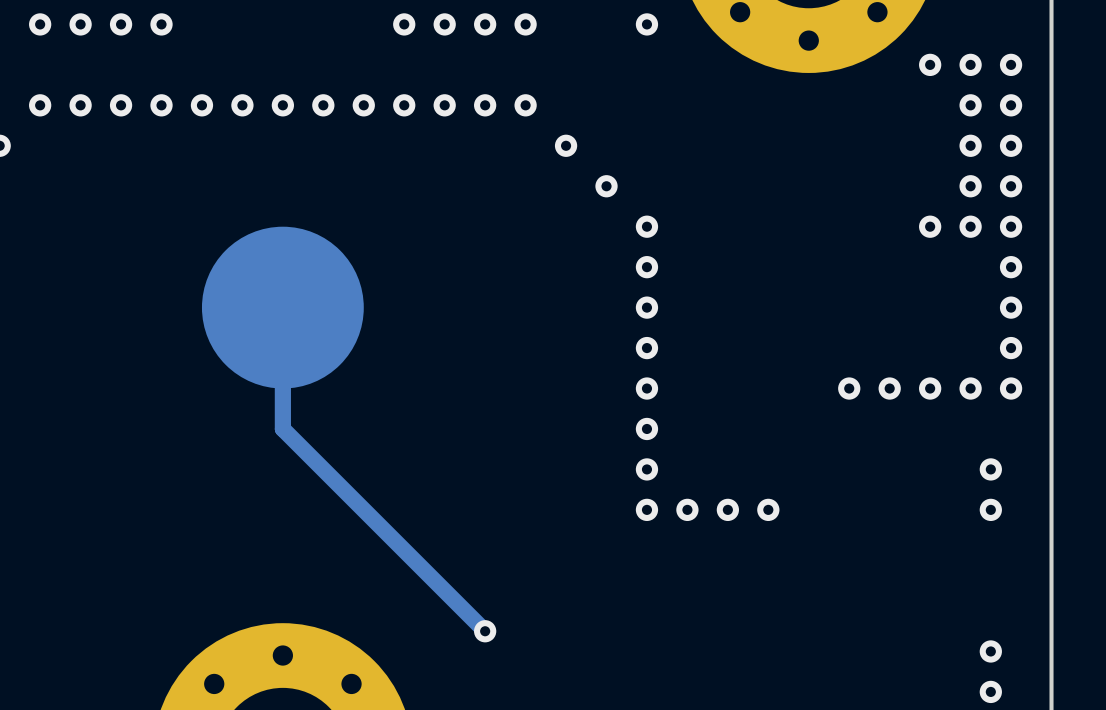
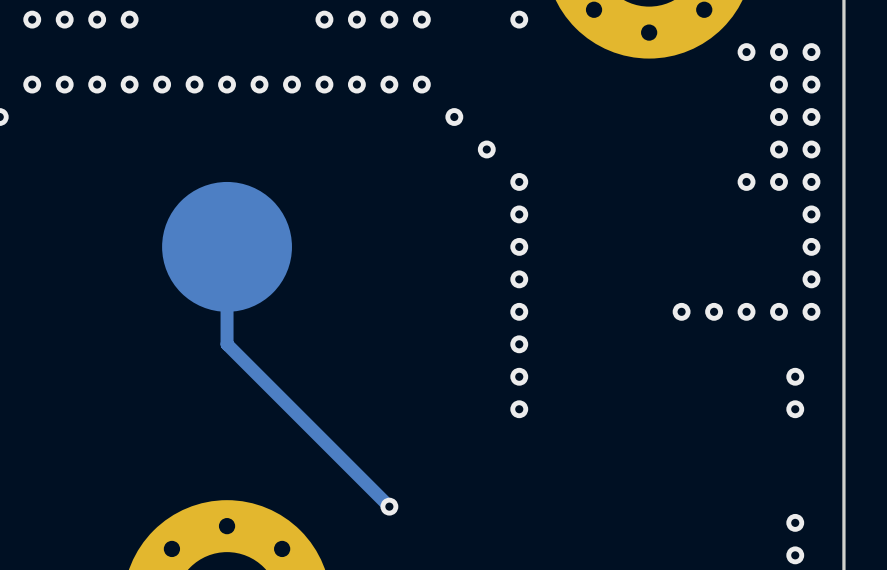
via: (687, 509) -> none
via: (727, 509) -> none
via: (768, 509) -> none

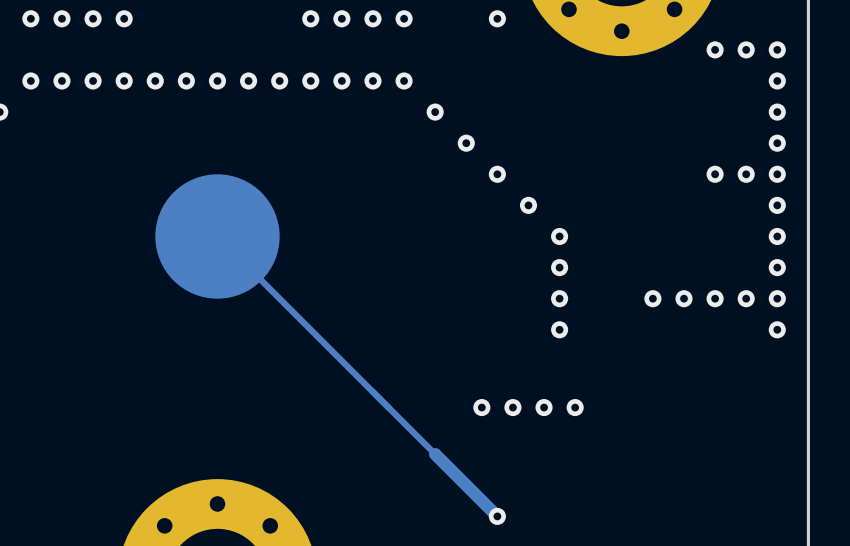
via: (779, 84) -> none
via: (779, 117) -> none
via: (779, 149) -> none
via: (519, 214) -> none
via: none -> (528, 205)
track: (227, 246) (227, 344) (389, 506) -> (217, 236) (497, 516)
via: (519, 246) -> none
via: none -> (559, 236)
via: (519, 279) -> none
via: none -> (559, 267)
via: (519, 311) -> none
via: none -> (559, 298)
via: (519, 344) -> none
via: none -> (559, 329)
via: none -> (777, 329)
via: (519, 376) -> none
via: (795, 376) -> none
via: (519, 409) -> none
via: (795, 409) -> none
via: none -> (481, 407)
via: none -> (512, 407)
via: none -> (544, 407)
via: none -> (575, 407)
via: (389, 506) -> none
via: (795, 522) -> none
via: none -> (497, 516)
via: (795, 555) -> none

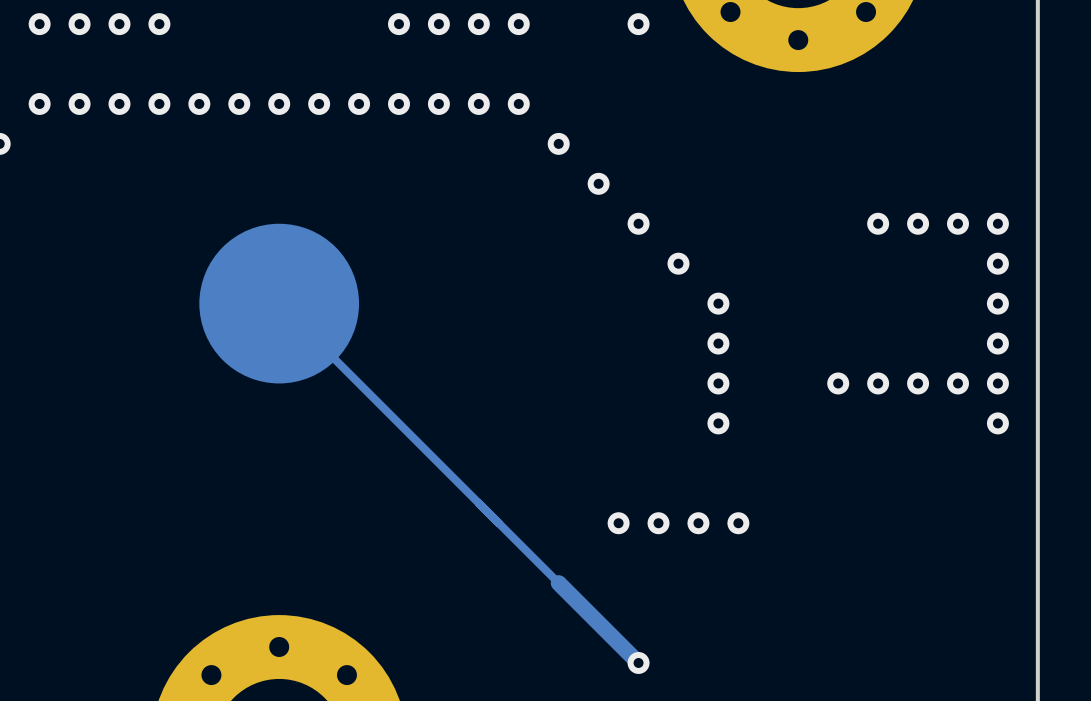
via: (715, 49) -> none
via: (746, 49) -> none
via: (777, 49) -> none
via: (777, 80) -> none
via: (777, 112) -> none
via: (777, 143) -> none
via: none -> (878, 223)

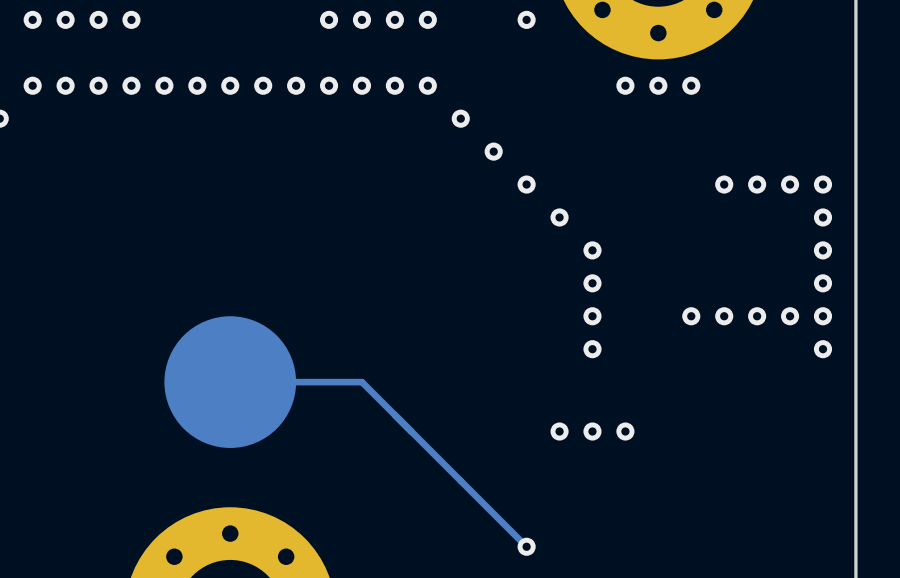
via: none -> (625, 85)
via: none -> (658, 85)
via: none -> (691, 85)
track: (279, 303) (438, 463) -> (230, 382) (361, 382)
part position: (279, 303) -> (230, 382)
via: (618, 523) -> none
via: (658, 523) -> none
via: none -> (559, 431)
via: (698, 523) -> none
via: none -> (592, 431)
via: (738, 523) -> none
via: none -> (625, 431)
track width: thick (558, 583) (638, 662) -> thin (460, 480) (526, 546)

